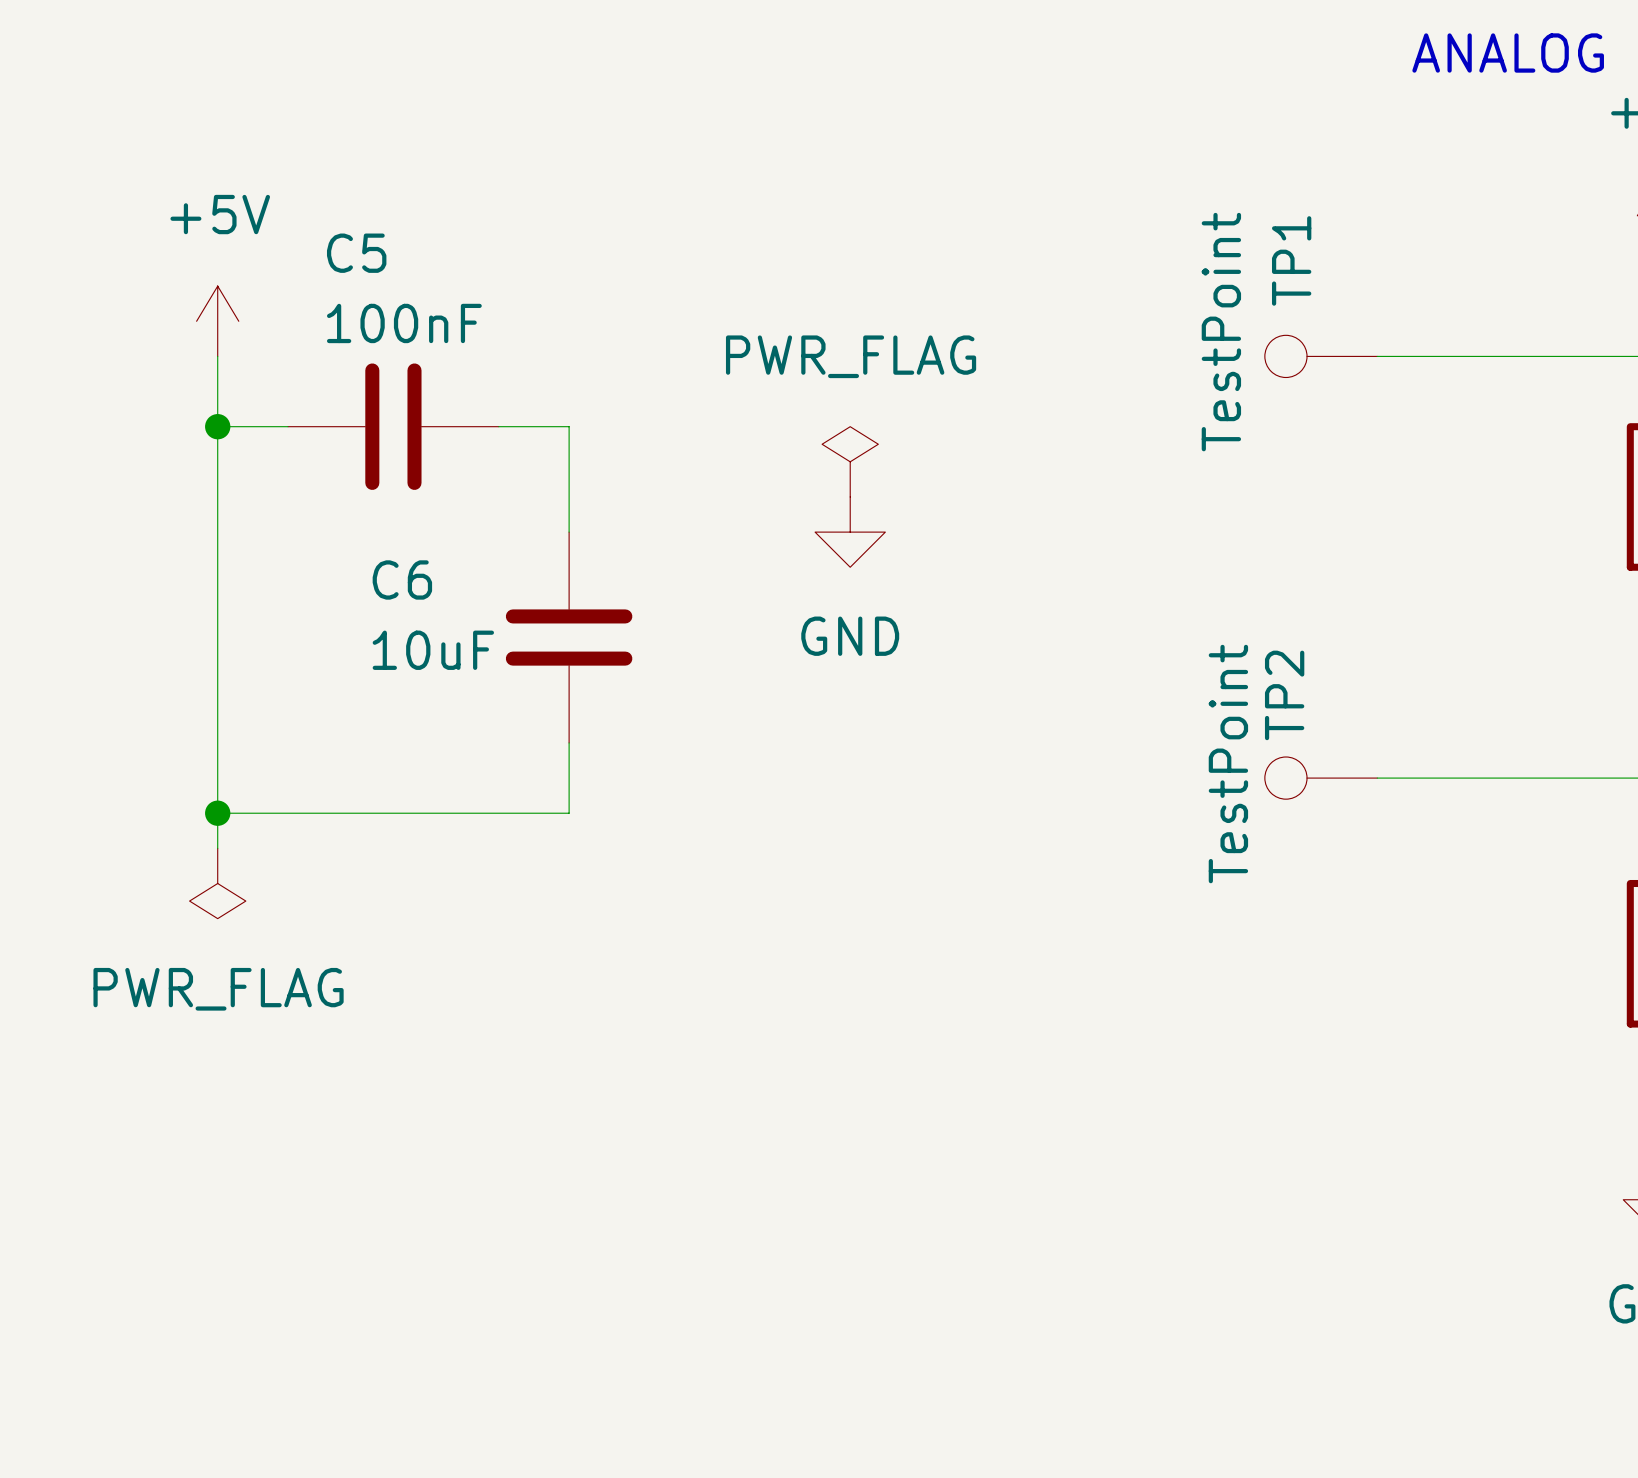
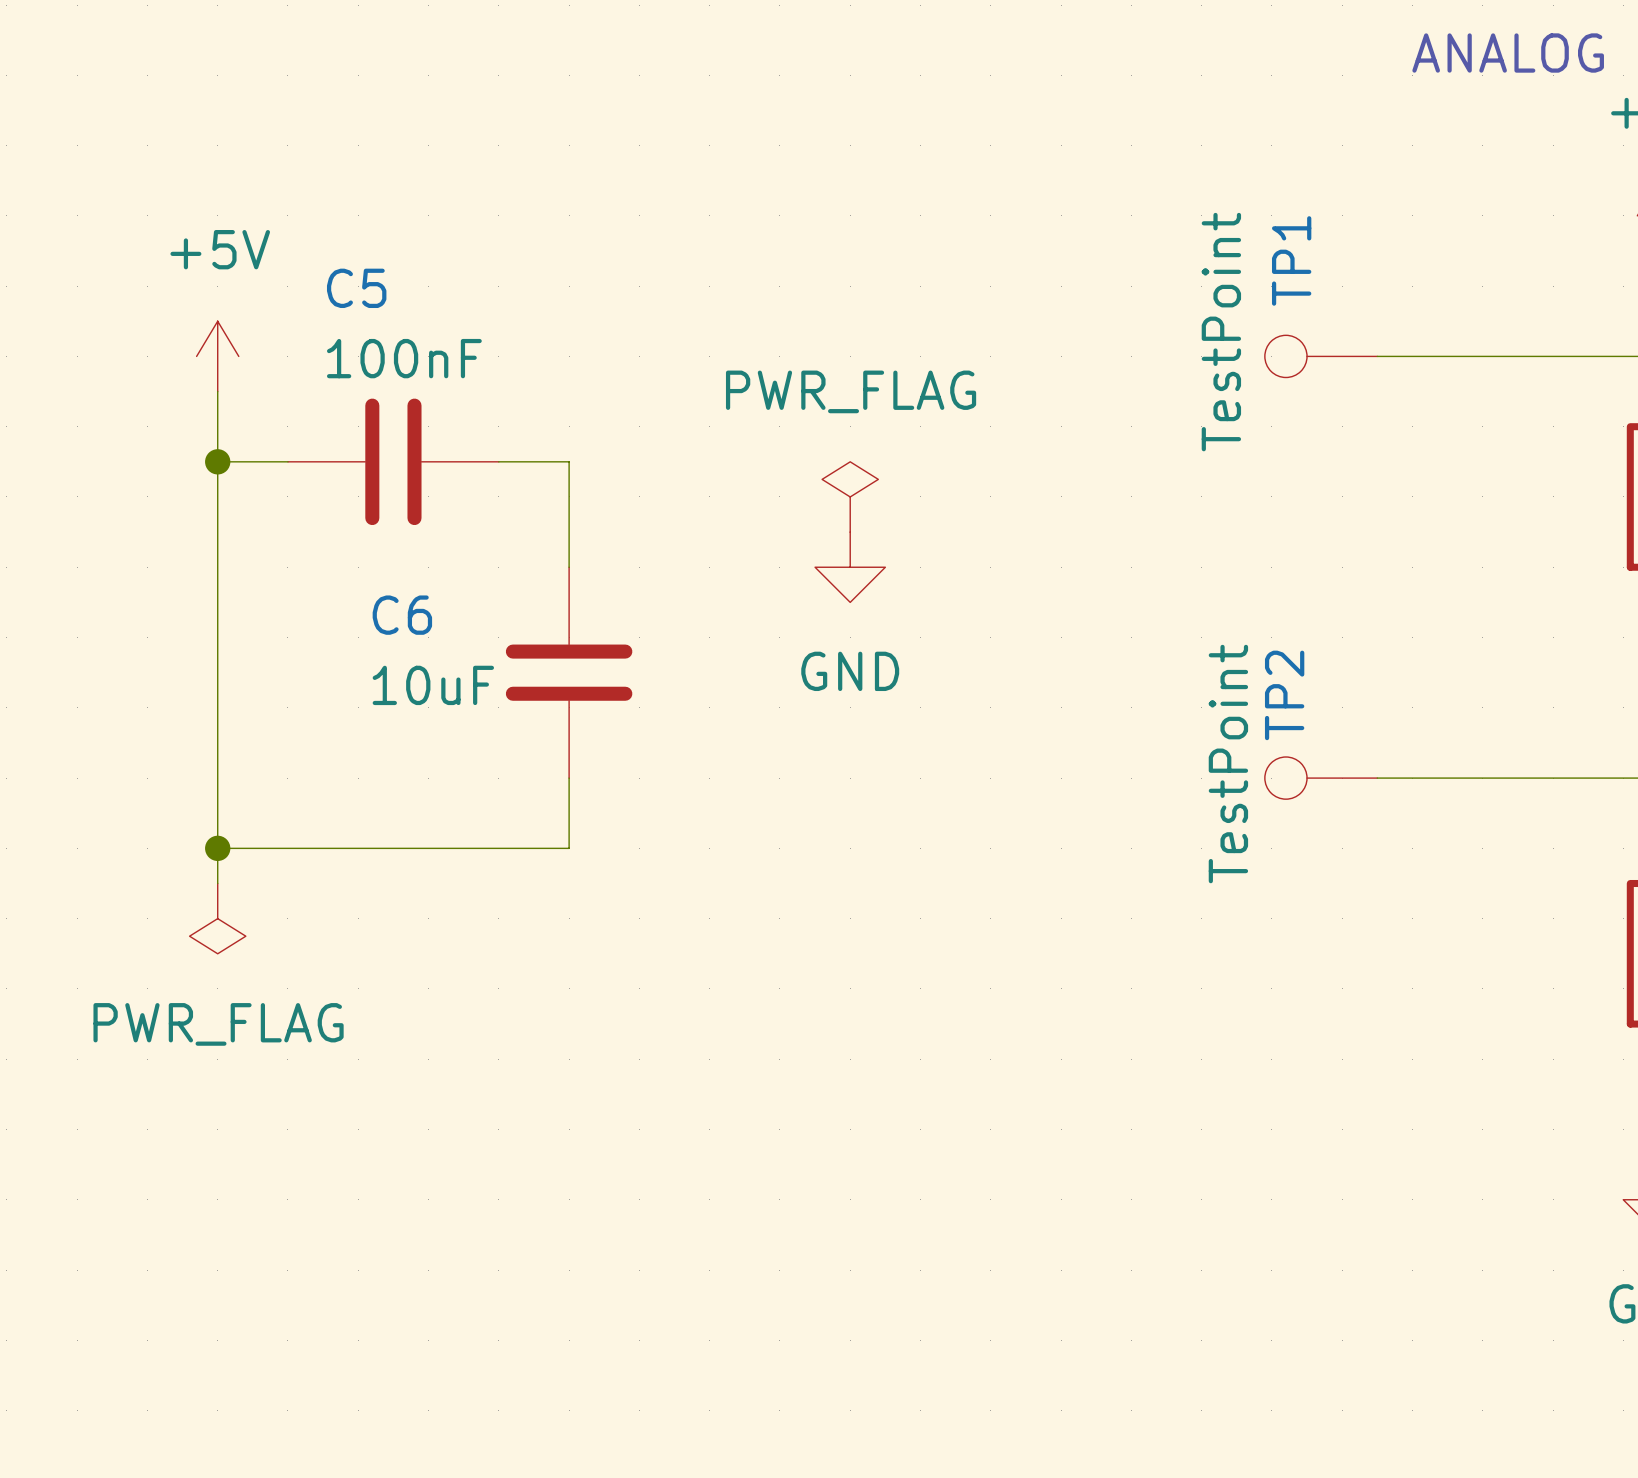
power symbol position: +5V (217, 321) -> +5V (217, 356)
wire: (217, 426) (287, 426) -> (217, 461) (287, 461)
junction position: (217, 426) -> (217, 461)
C5 position: (393, 426) -> (393, 461)
wire: (498, 426) (569, 426) (569, 461) -> (498, 461) (569, 461)
power symbol position: PWR_FLAG (850, 461) -> PWR_FLAG (850, 496)
power symbol position: GND (850, 532) -> GND (850, 567)
C6 position: (569, 637) -> (569, 672)
wire: (217, 813) (569, 813) -> (217, 883) (217, 848) (569, 848) (569, 813)
junction position: (217, 813) -> (217, 848)
power symbol position: PWR_FLAG (217, 883) -> PWR_FLAG (217, 918)

